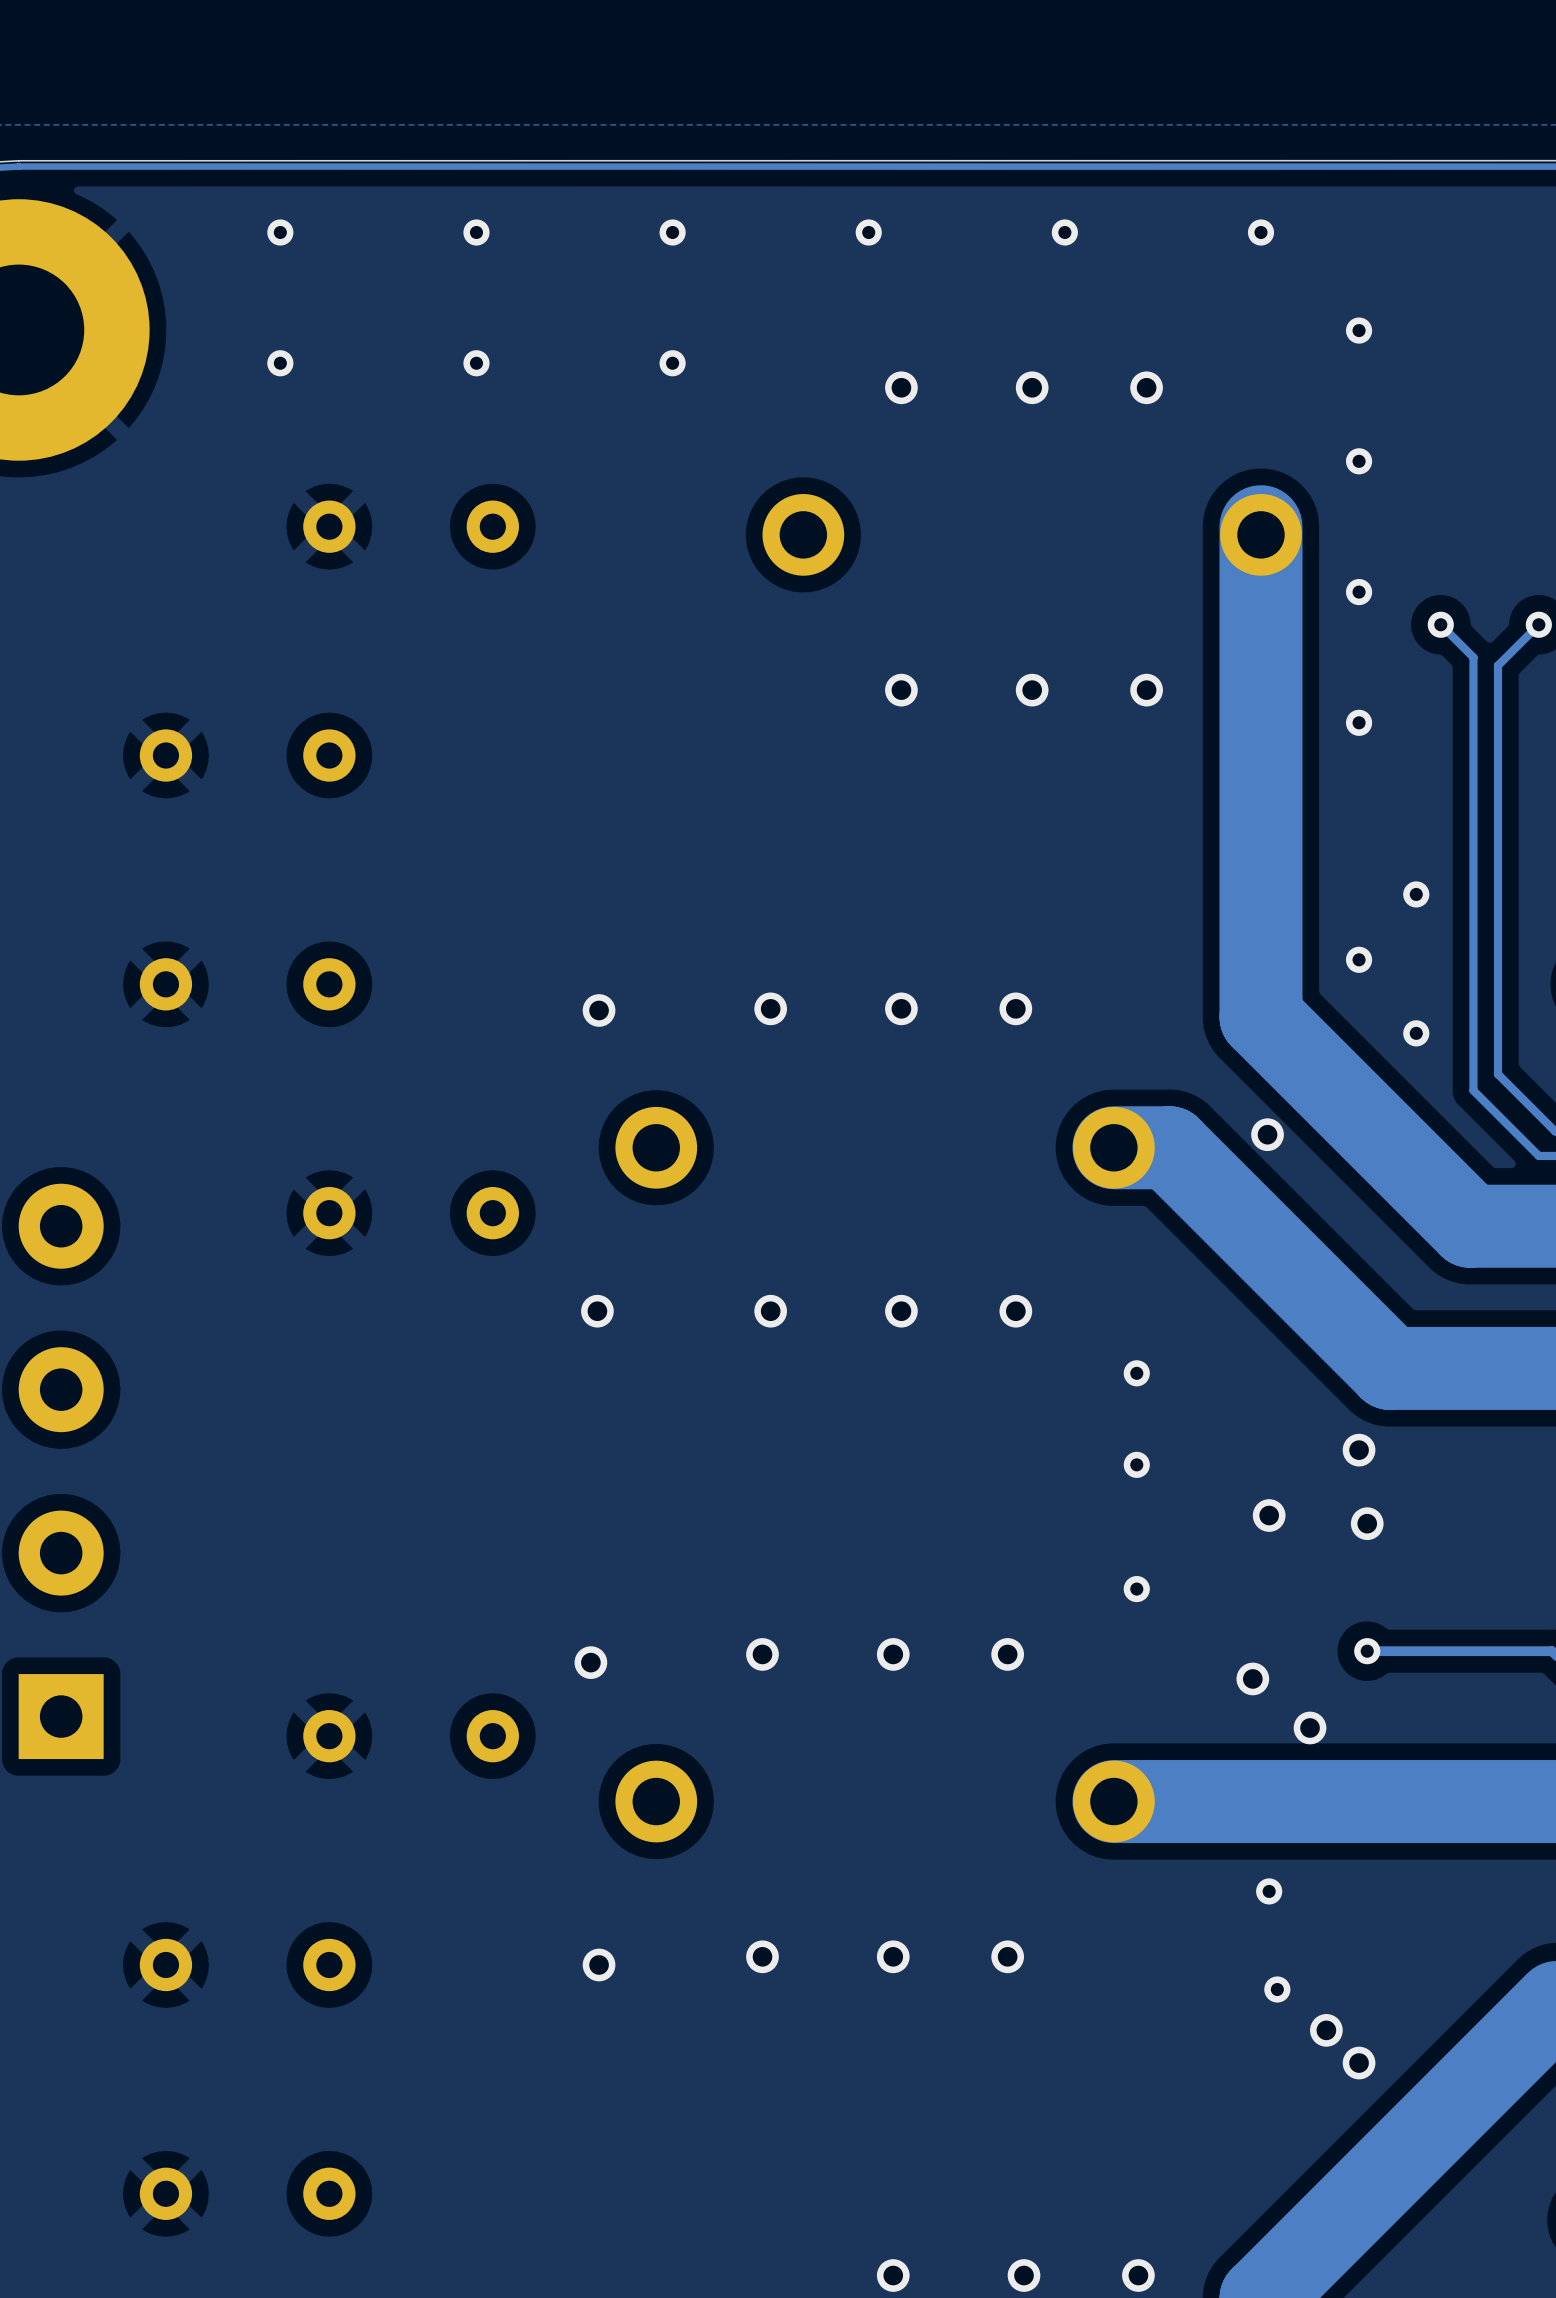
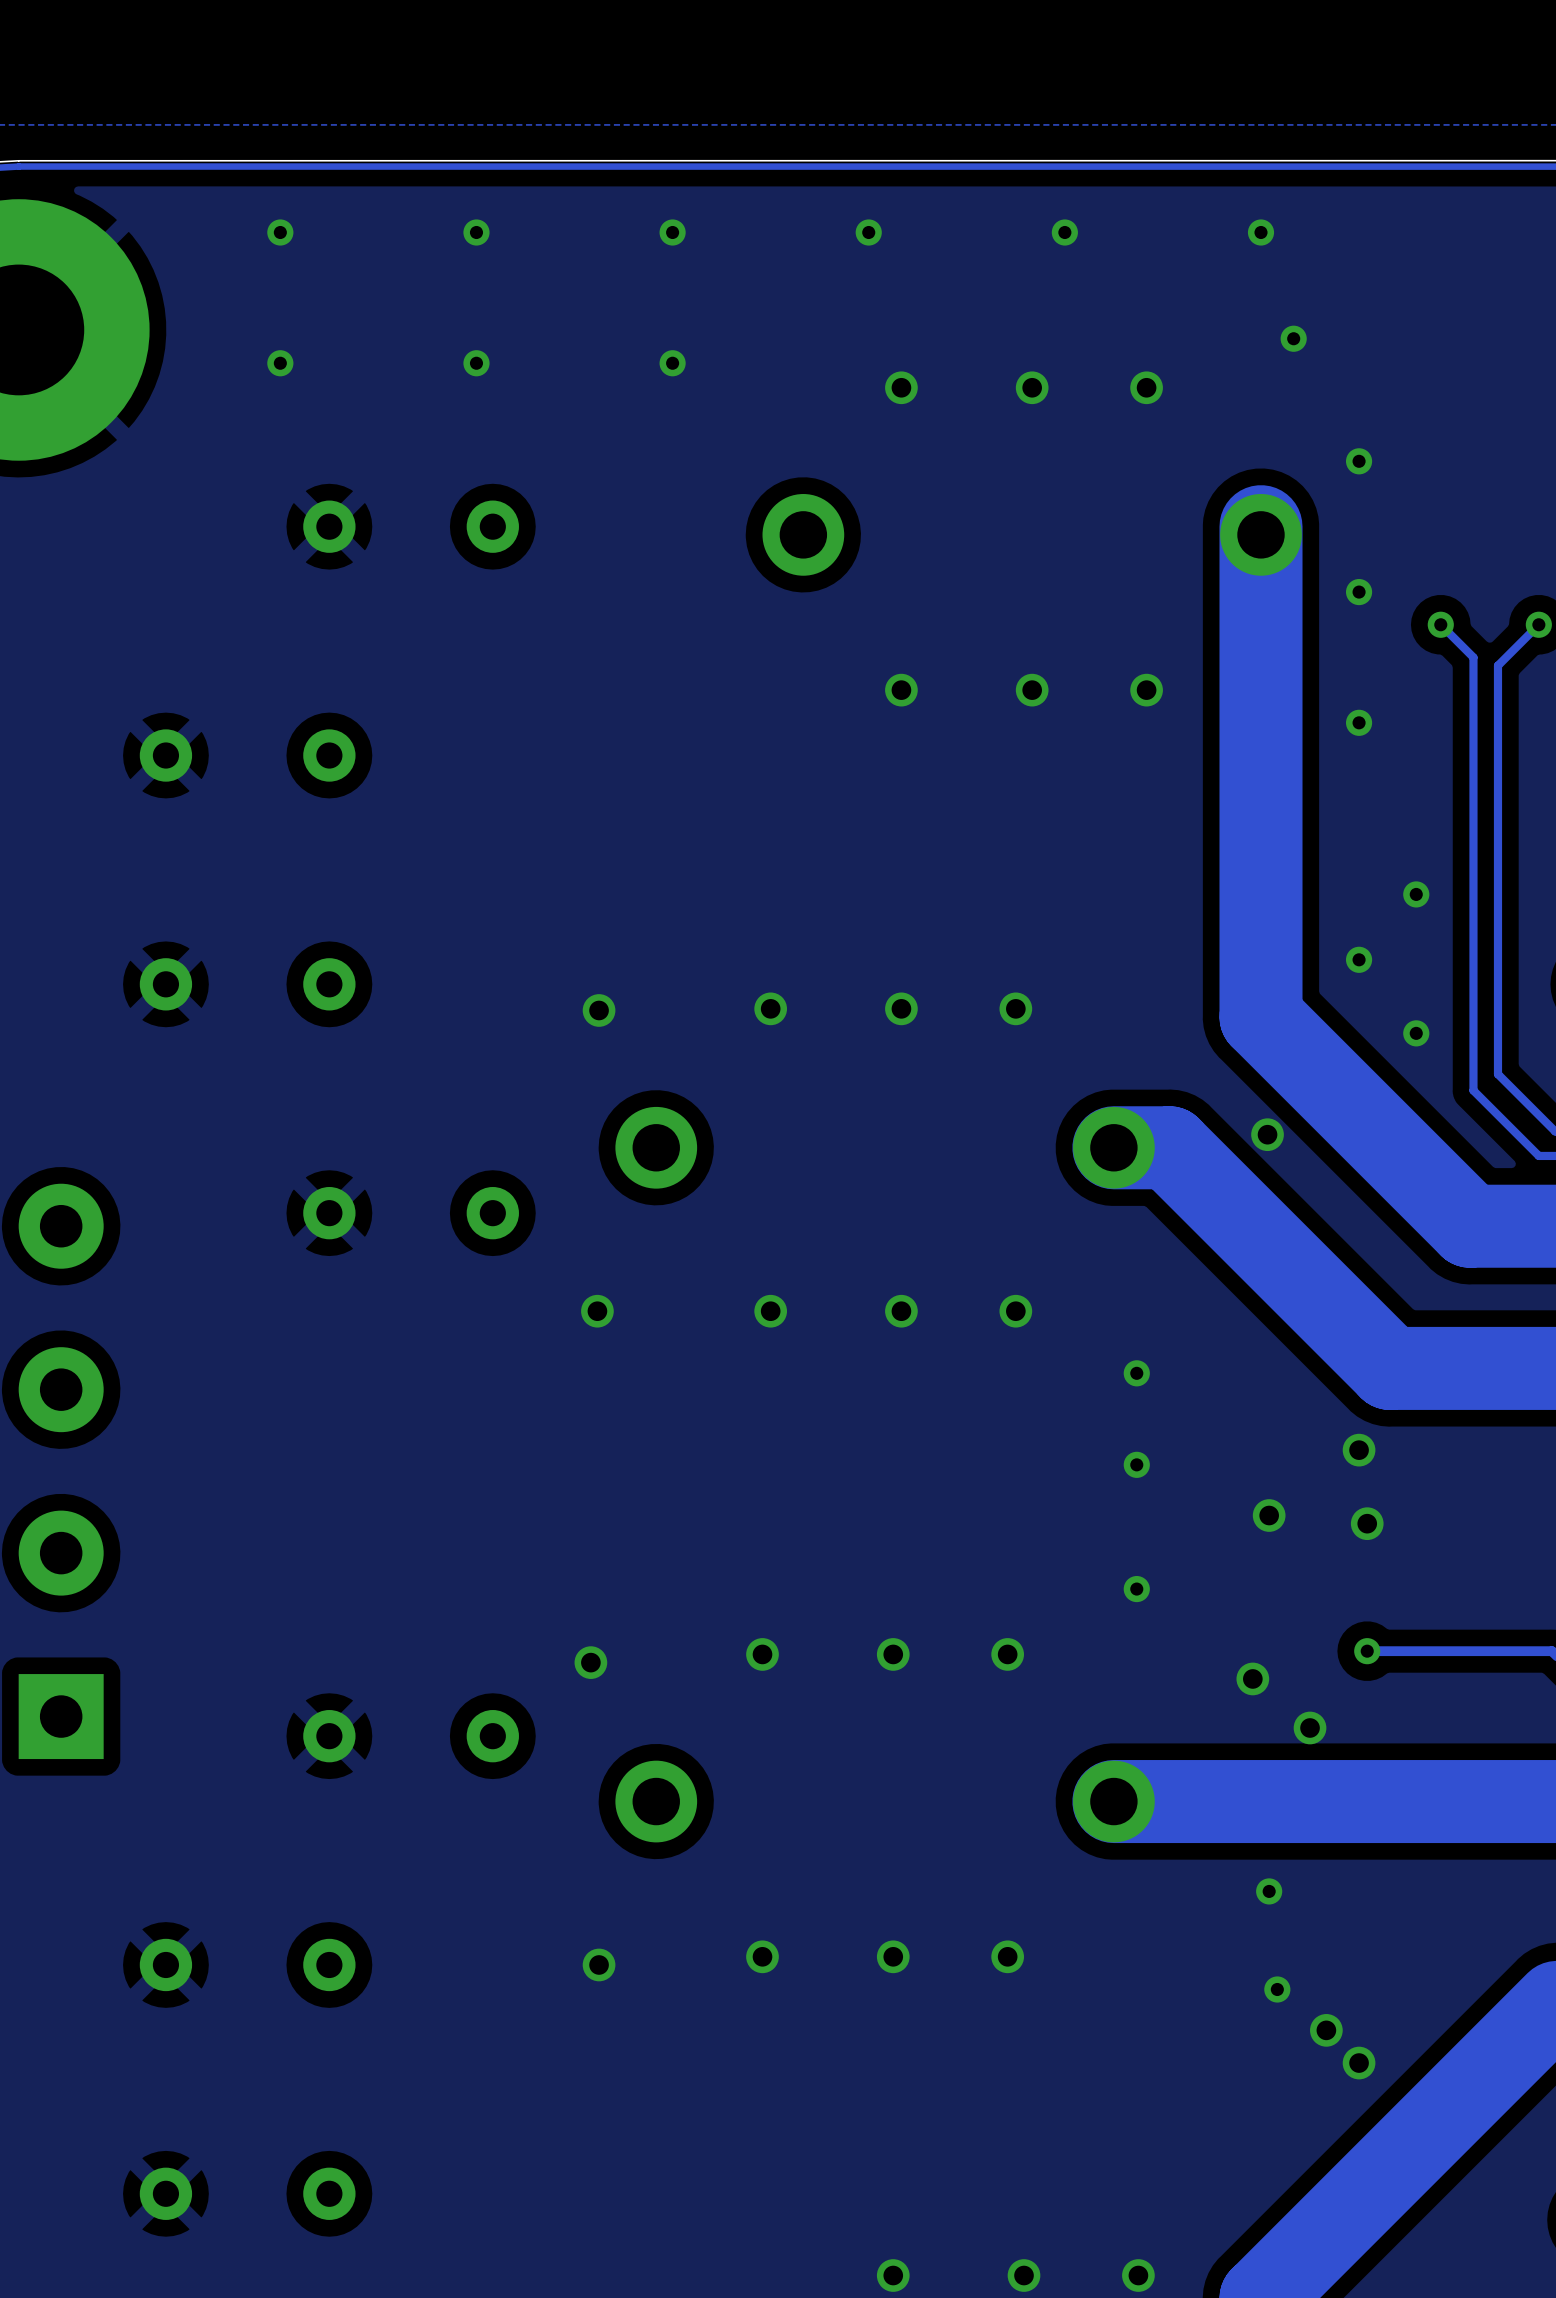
via position: (1359, 330) -> (1293, 338)

